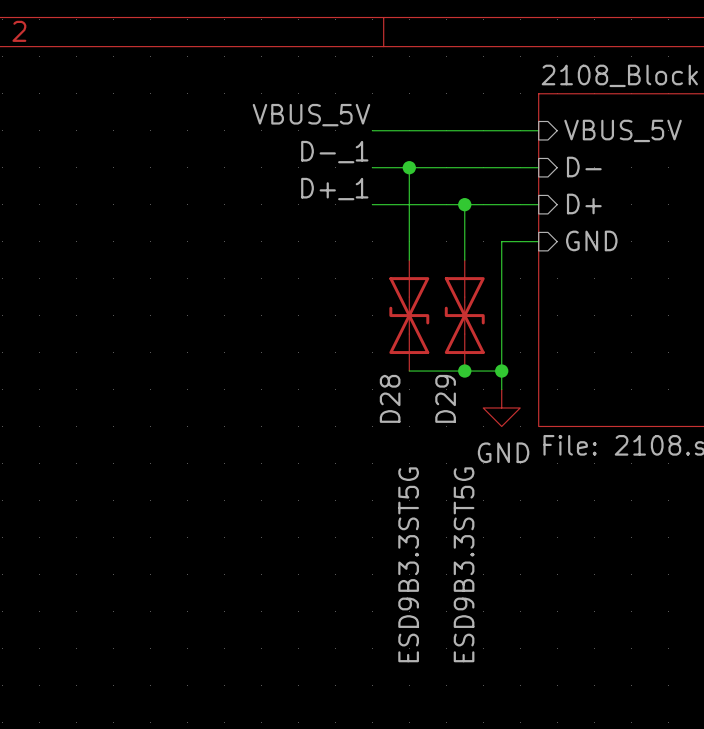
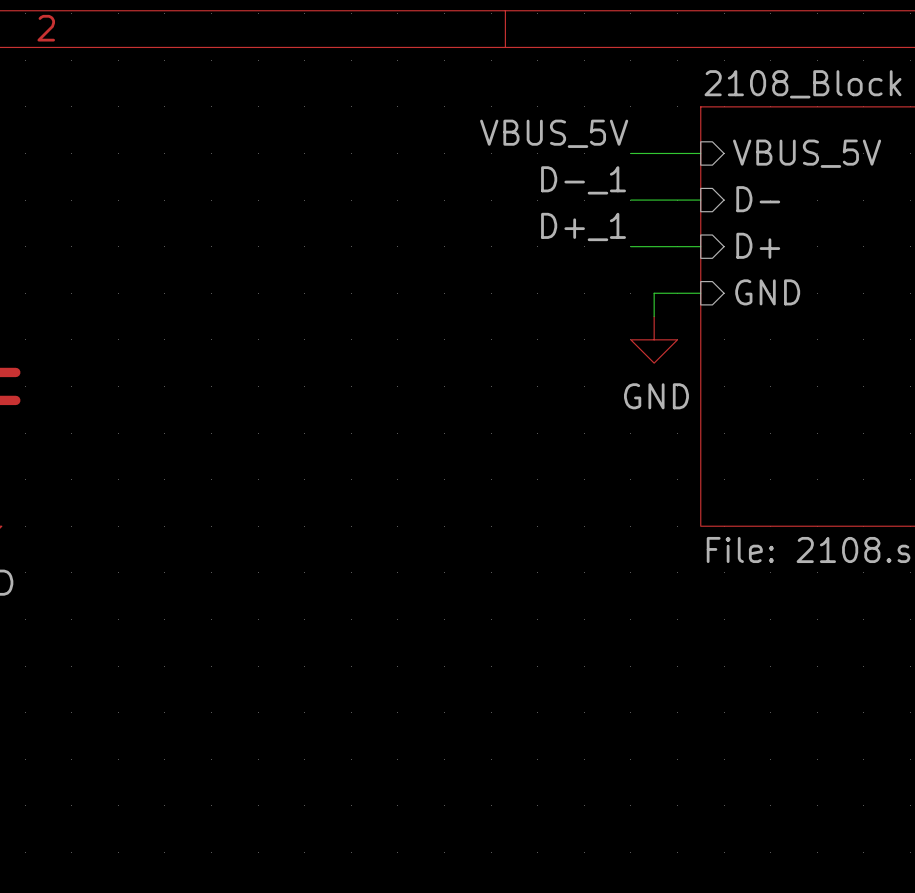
label position: VBUS_5V (311, 115) -> VBUS_5V (554, 133)
wire: (372, 130) (483, 130) -> none
label position: D-_1 (334, 152) -> D-_1 (583, 180)
wire: (372, 167) (483, 167) -> none
wire: (409, 167) (409, 260) -> none
junction: (409, 167) -> none
label position: D+_1 (334, 189) -> D+_1 (583, 226)
wire: (372, 204) (483, 204) -> none
wire: (464, 204) (464, 260) -> none
junction: (464, 204) -> none
wire: (501, 260) (501, 389) -> none
D28: ESD9B3.3ST5G (409, 315) -> none
D29: ESD9B3.3ST5G (464, 315) -> none
wire: (409, 371) (501, 371) -> none
junction: (464, 371) -> none
junction: (501, 371) -> none
power symbol position: GND (501, 407) -> GND (654, 339)

